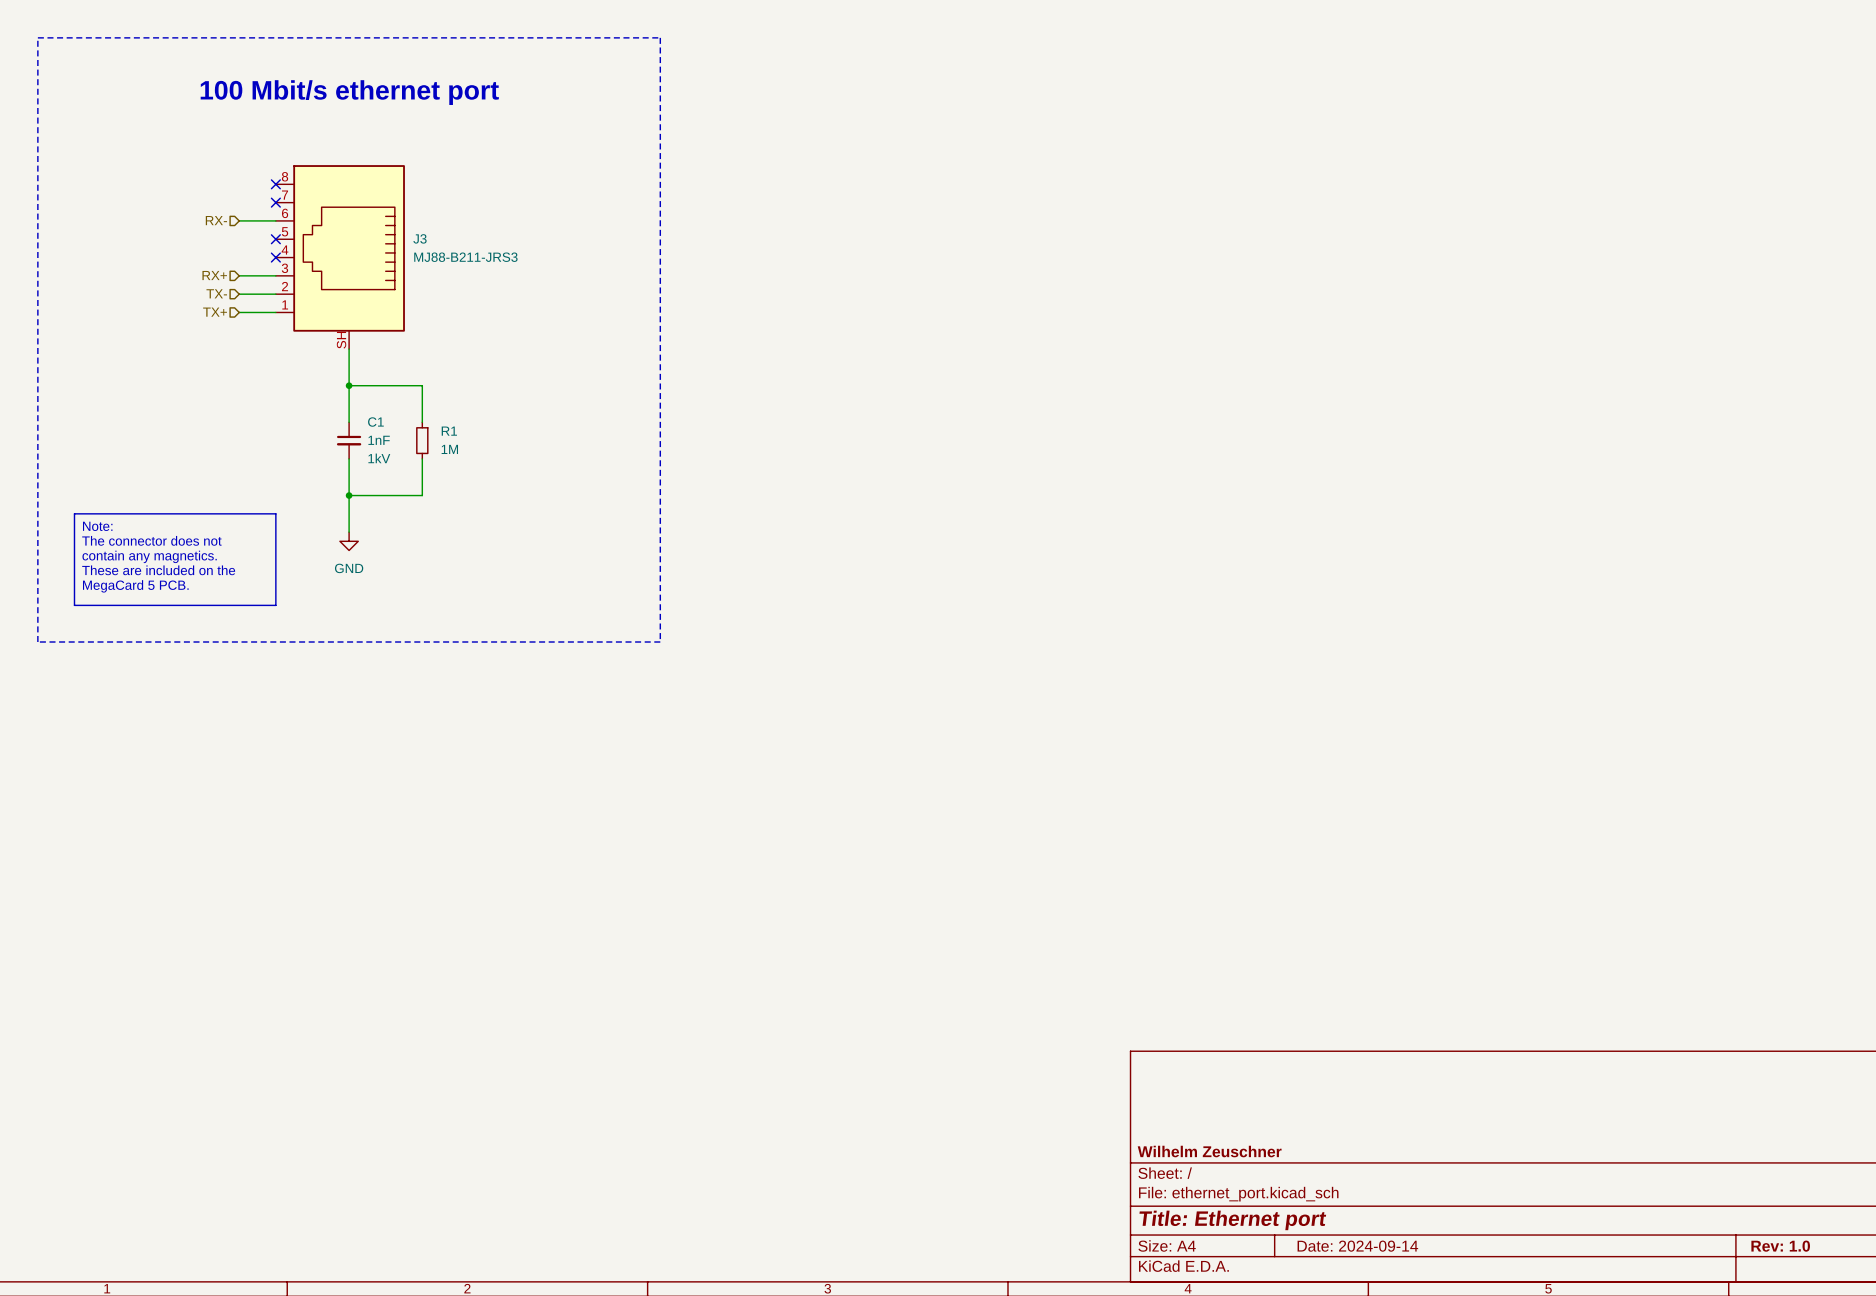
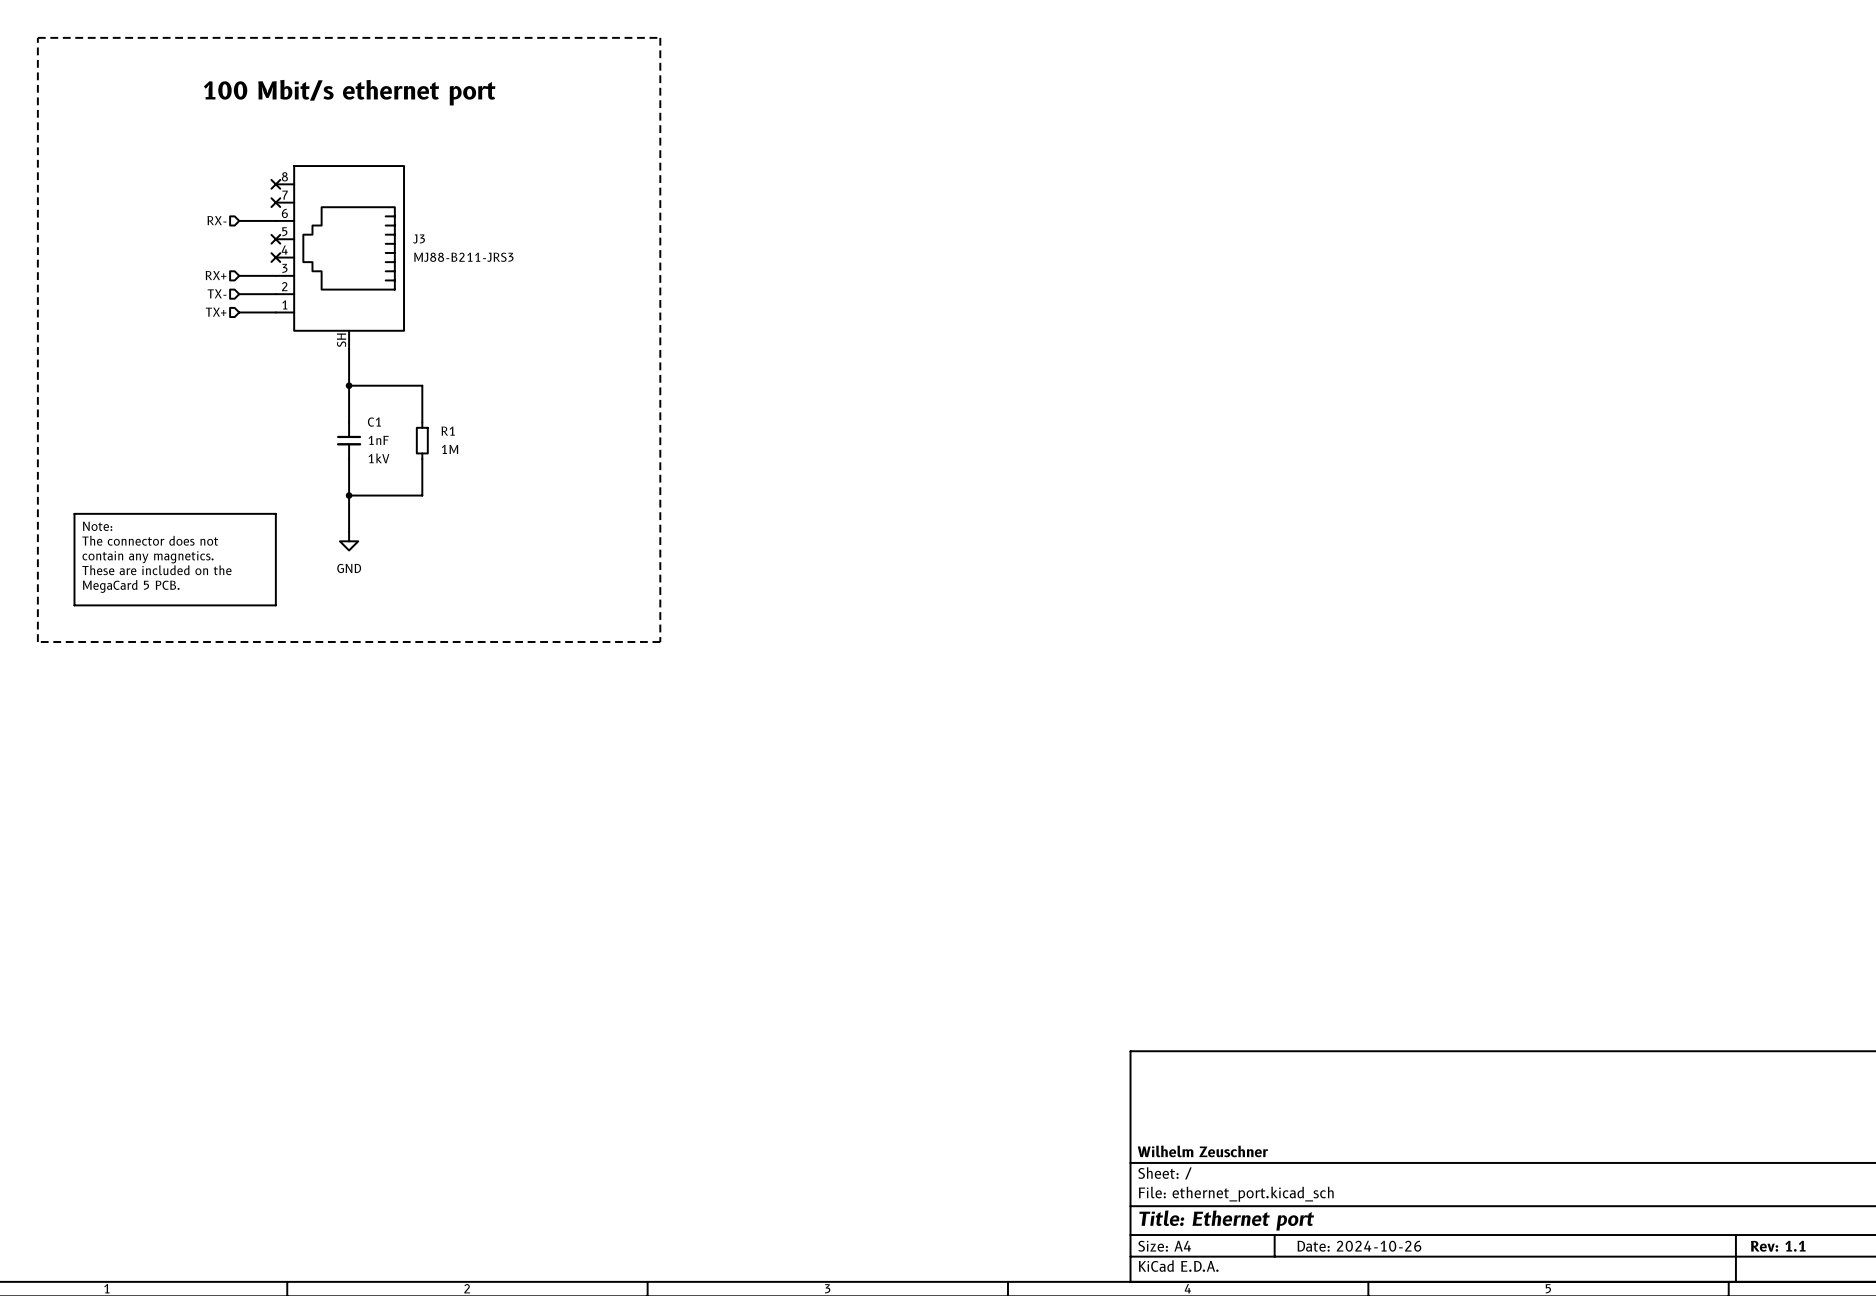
title block: Date: 2024-09-14 (1357, 1246) -> Date: 2024-10-26 (1359, 1246)
title block: Rev: 1.0 (1780, 1246) -> Rev: 1.1 (1778, 1246)

